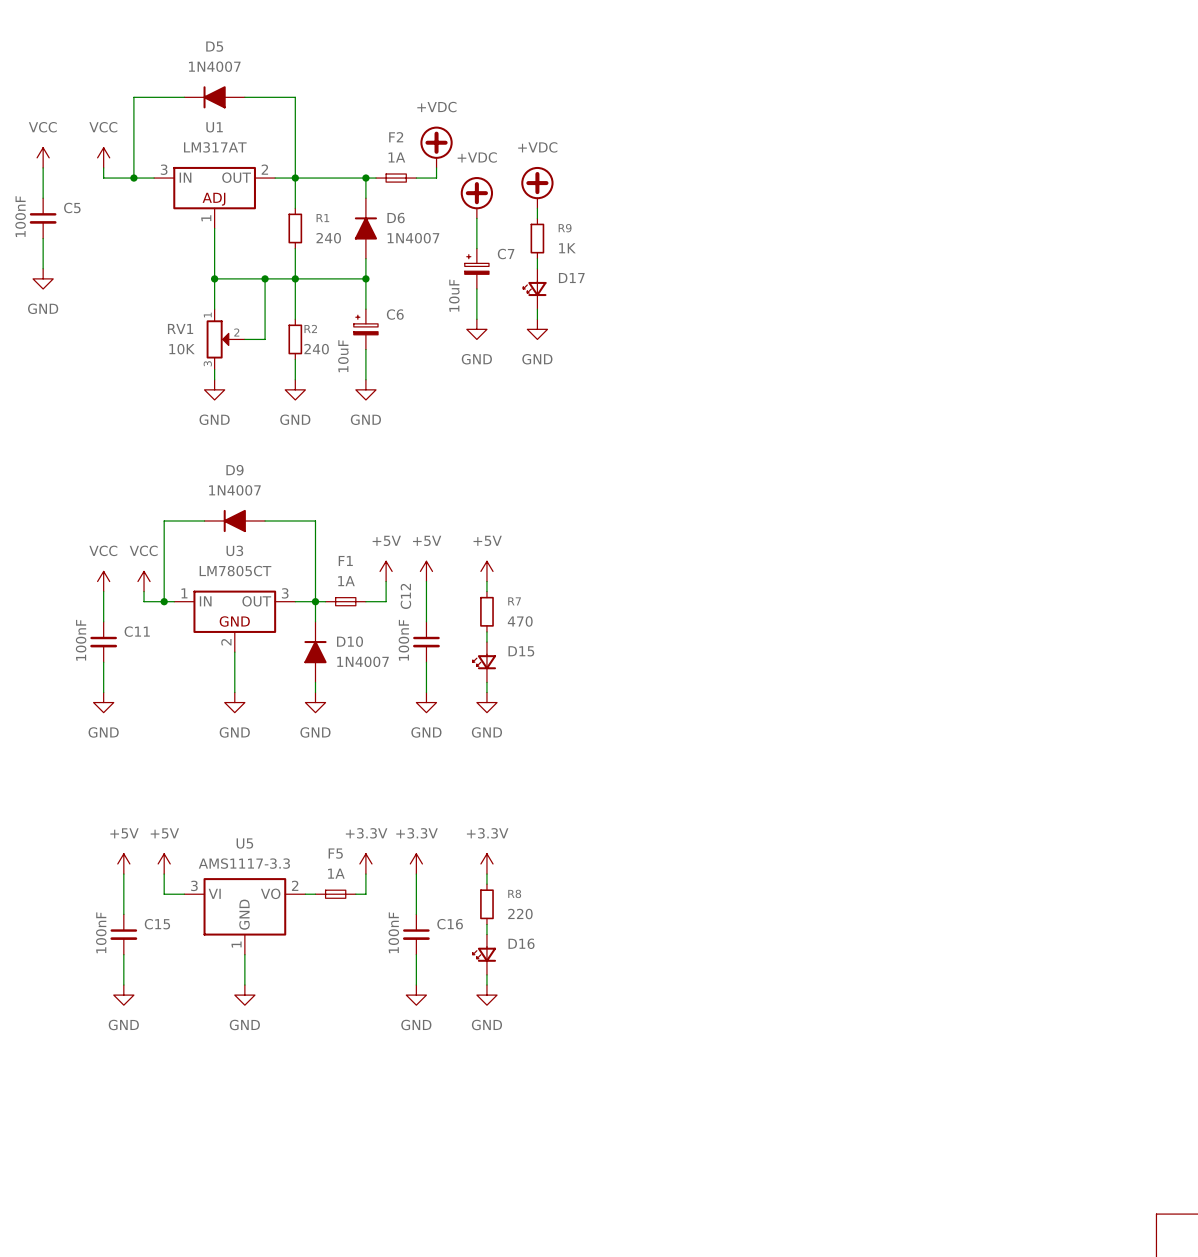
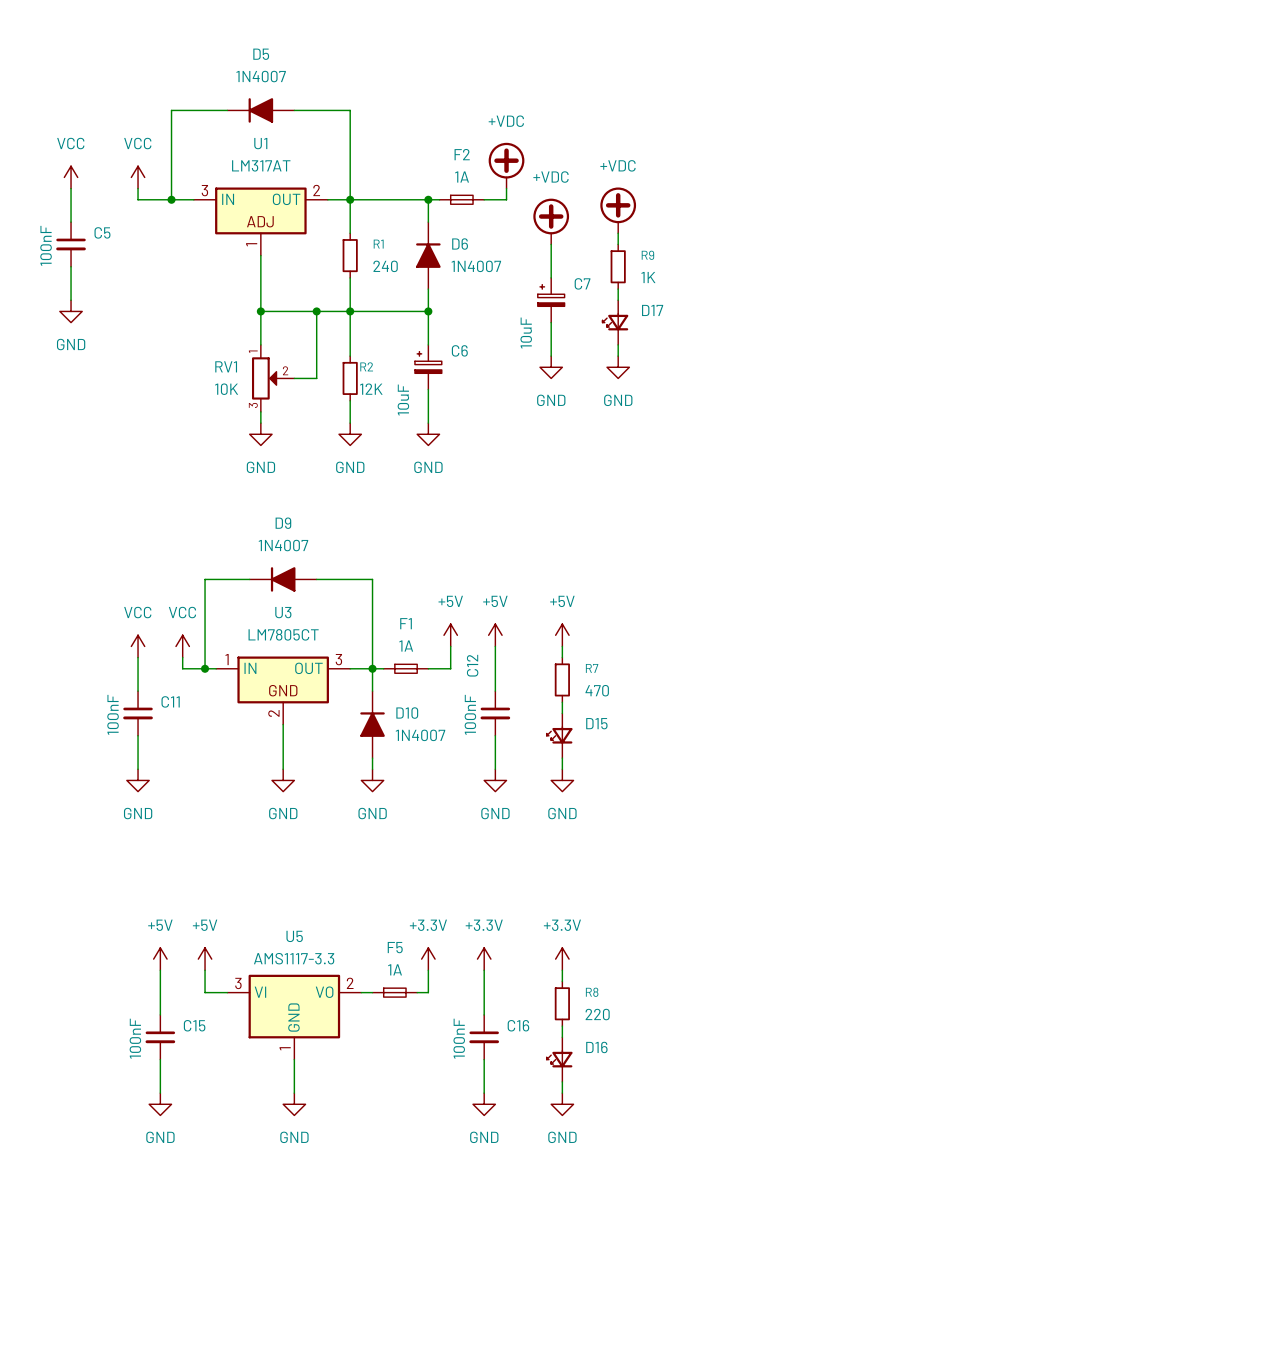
R2 value: 240 (316, 349) -> 12K (371, 389)

